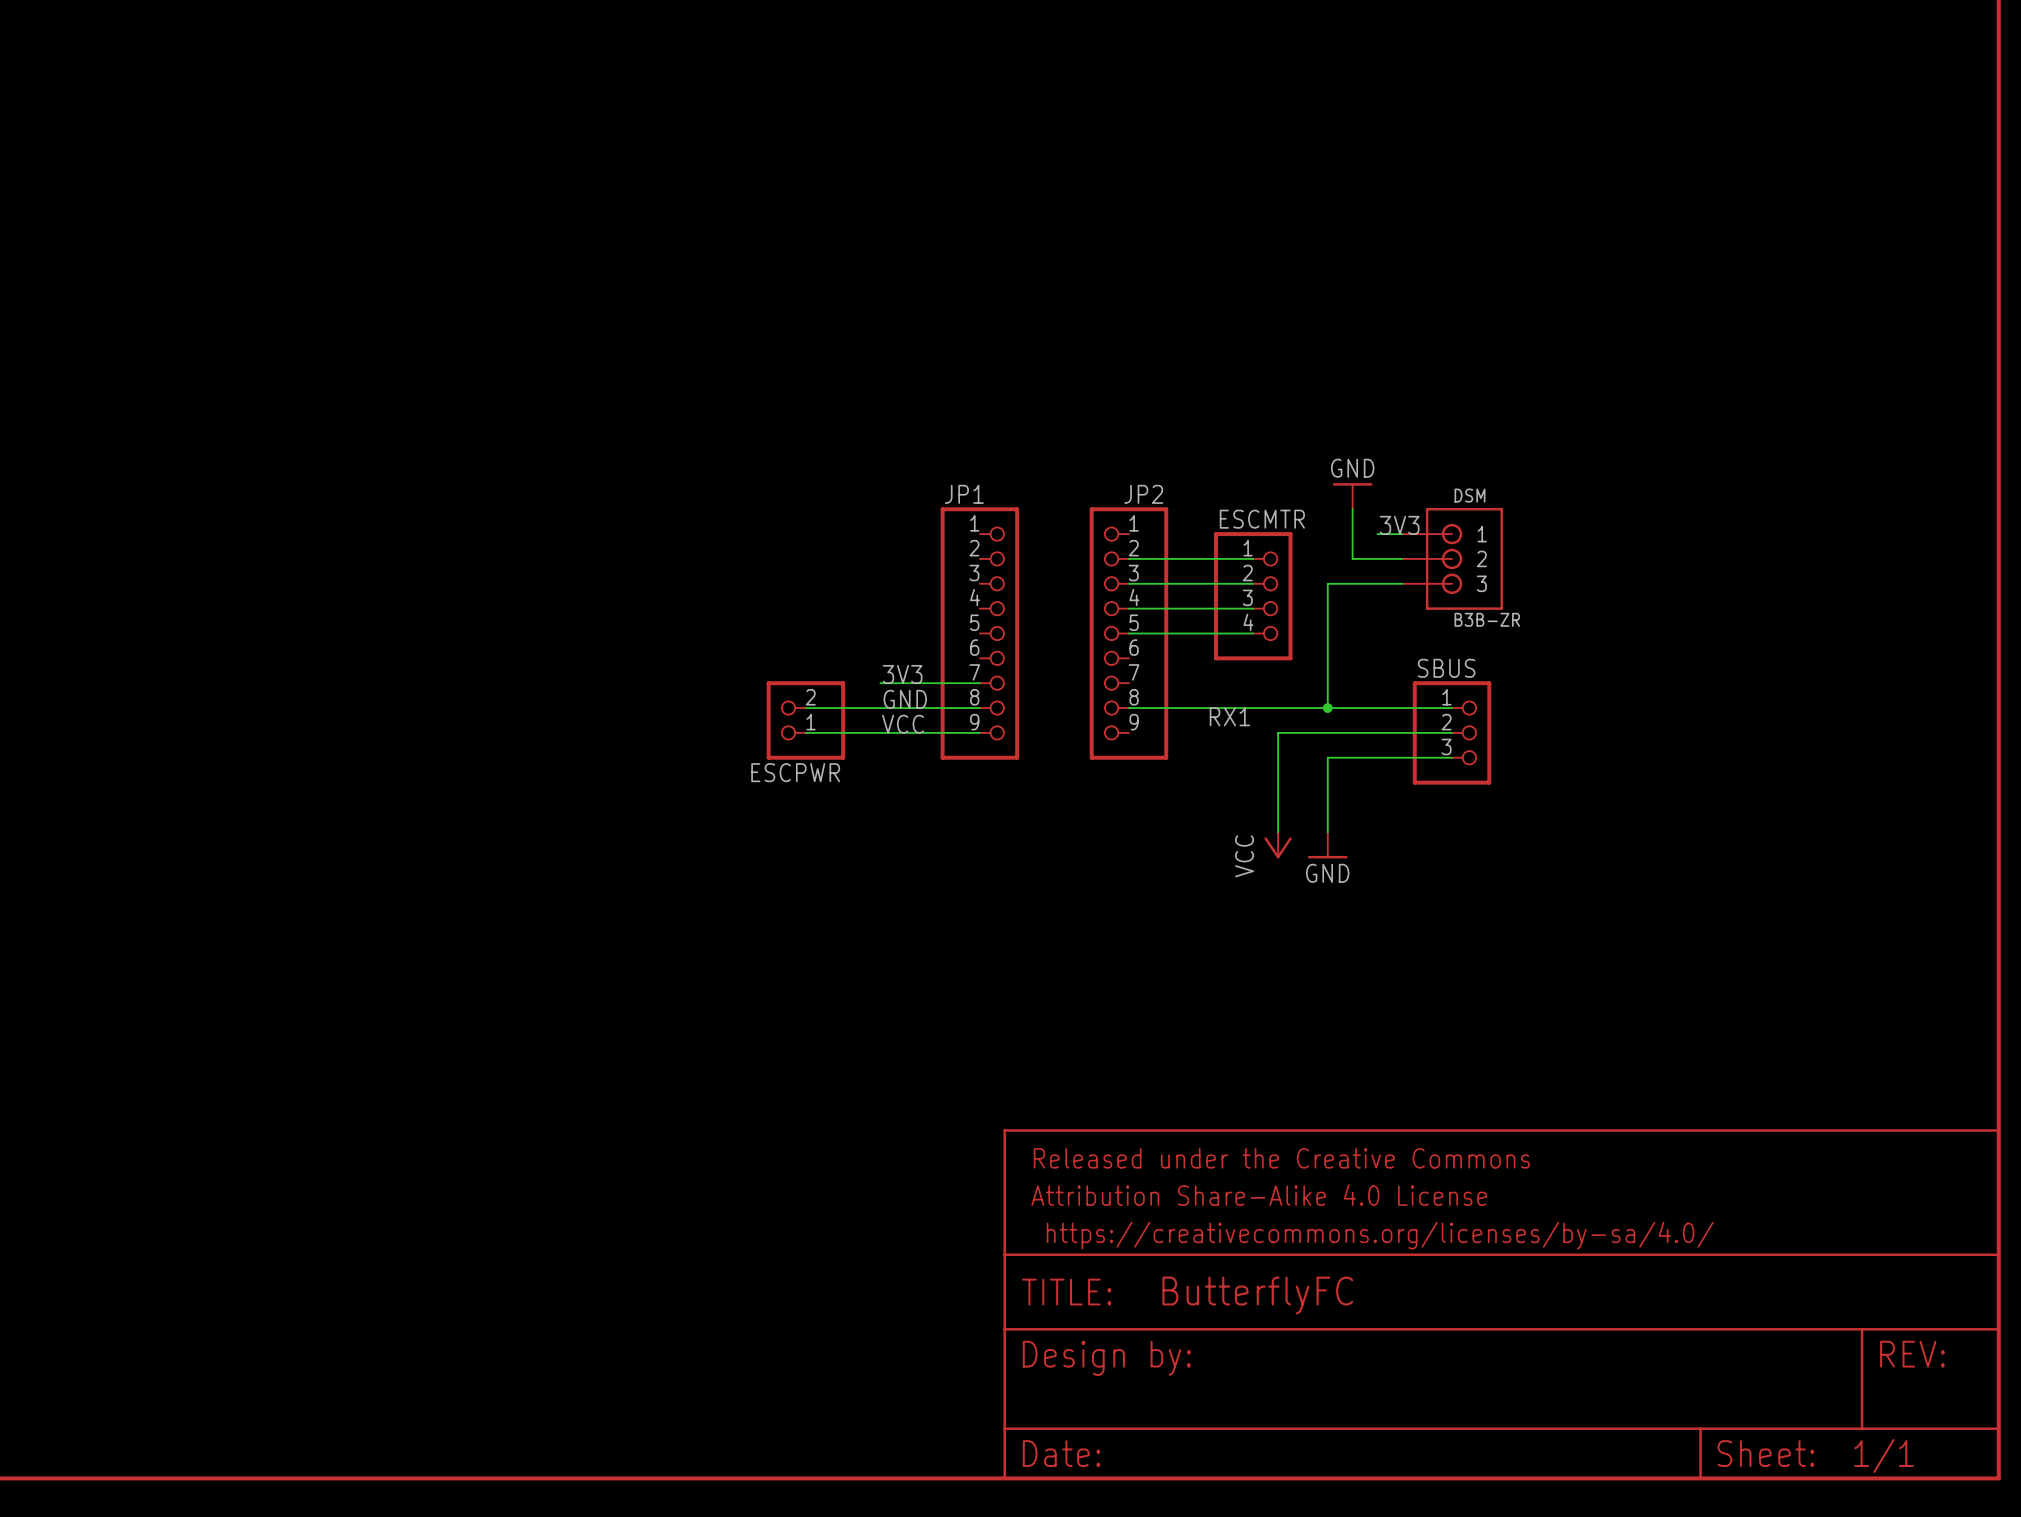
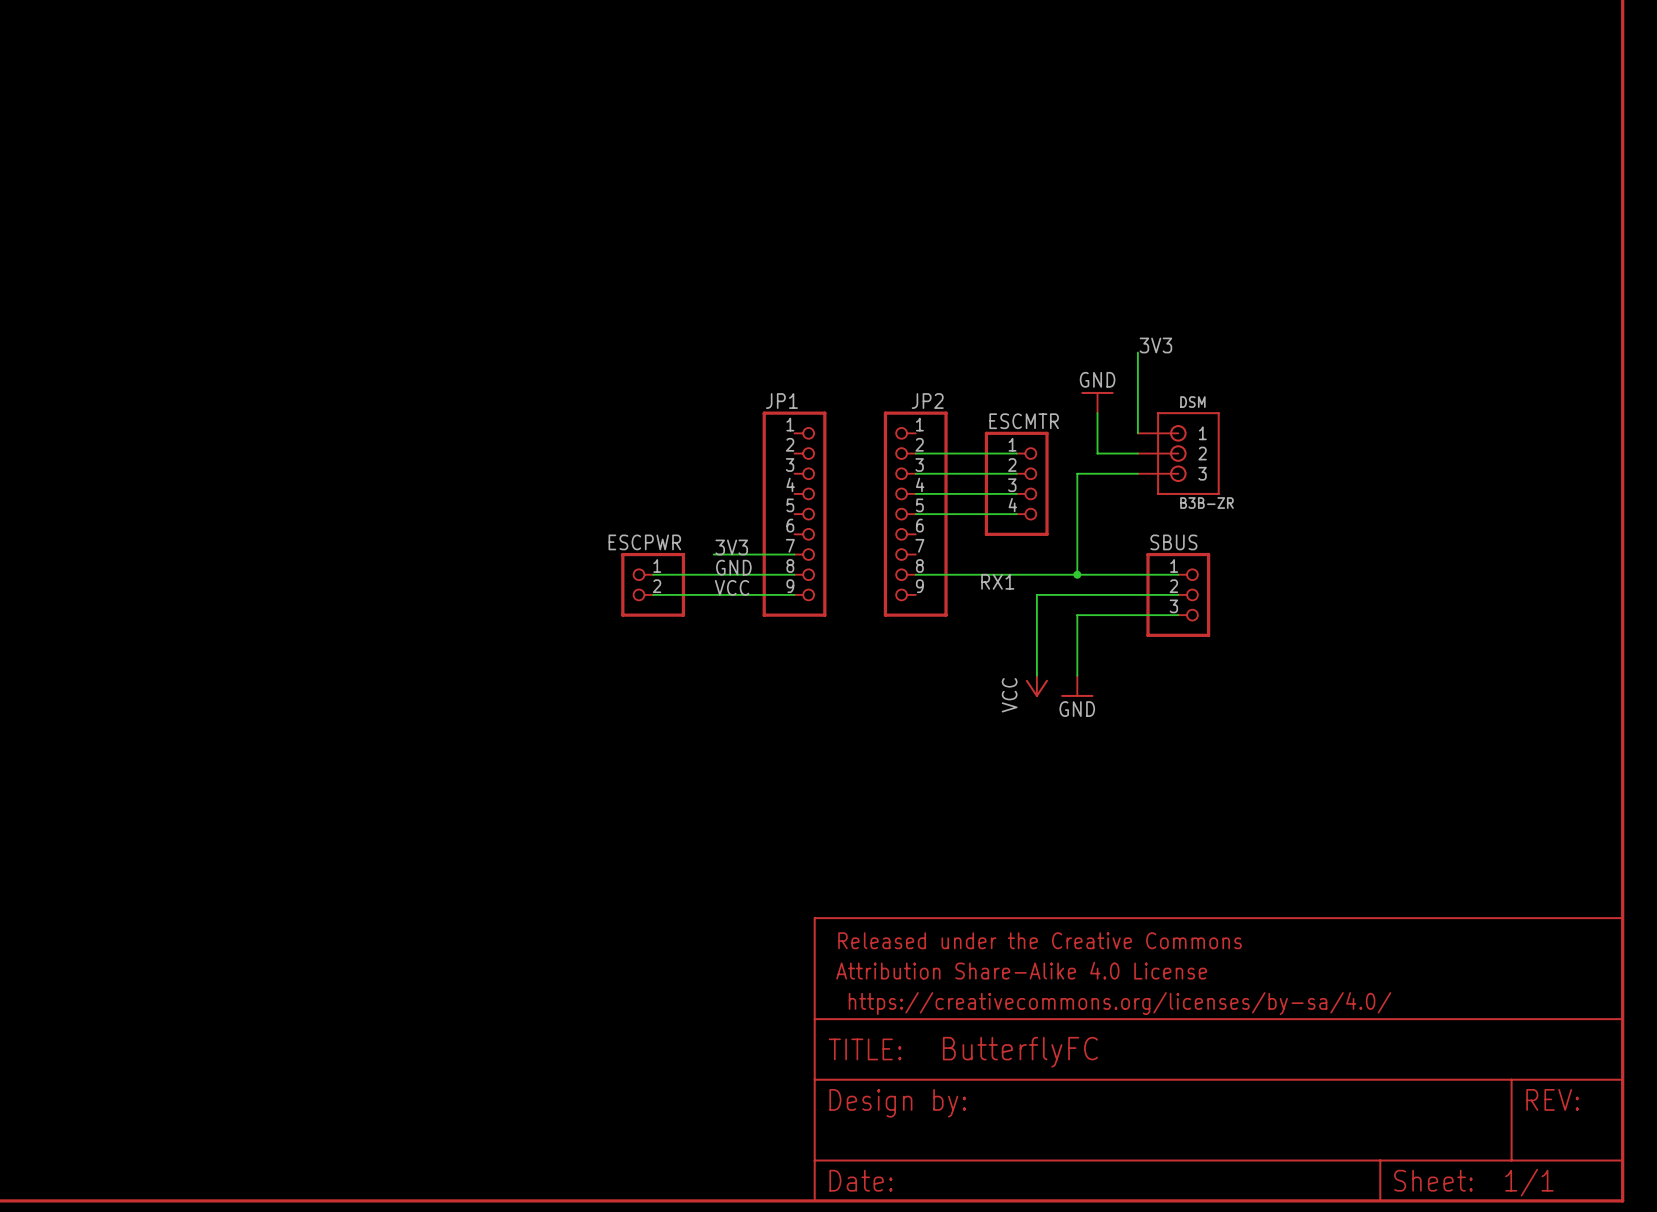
label position: 3V3 (1399, 525) -> 3V3 (1155, 345)
wire: (1377, 534) (1402, 534) -> (1137, 352) (1137, 433)
ESCPWR flip: as is (805, 720) -> up-down (653, 584)

